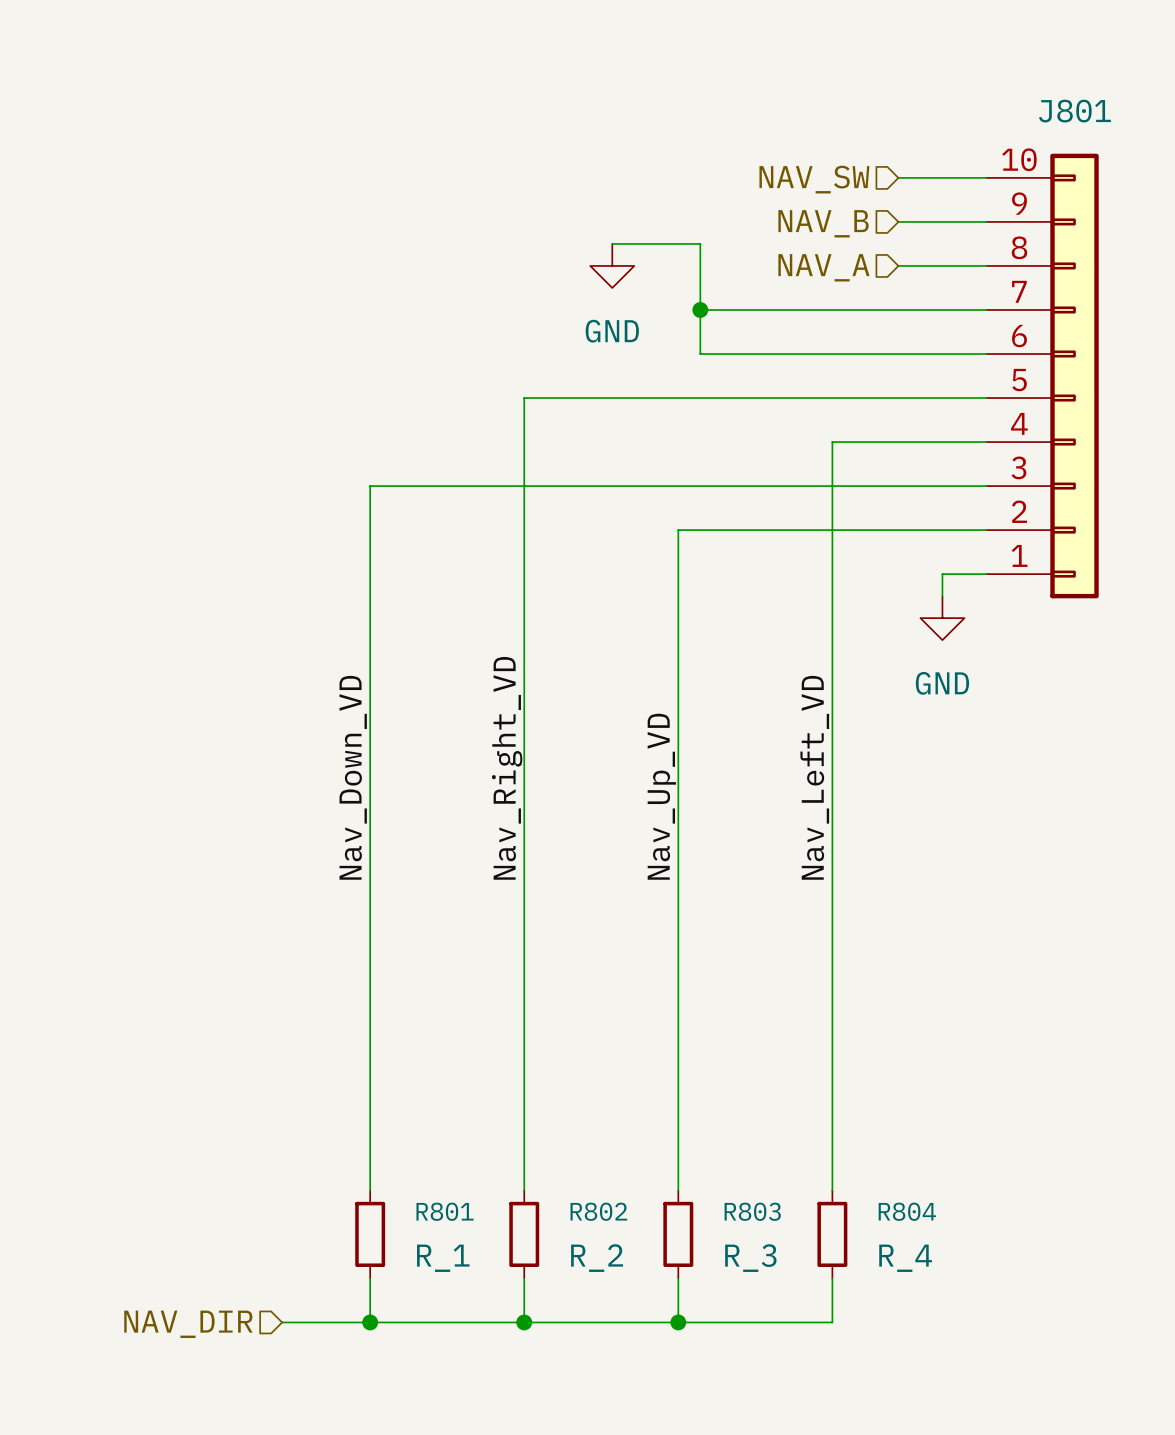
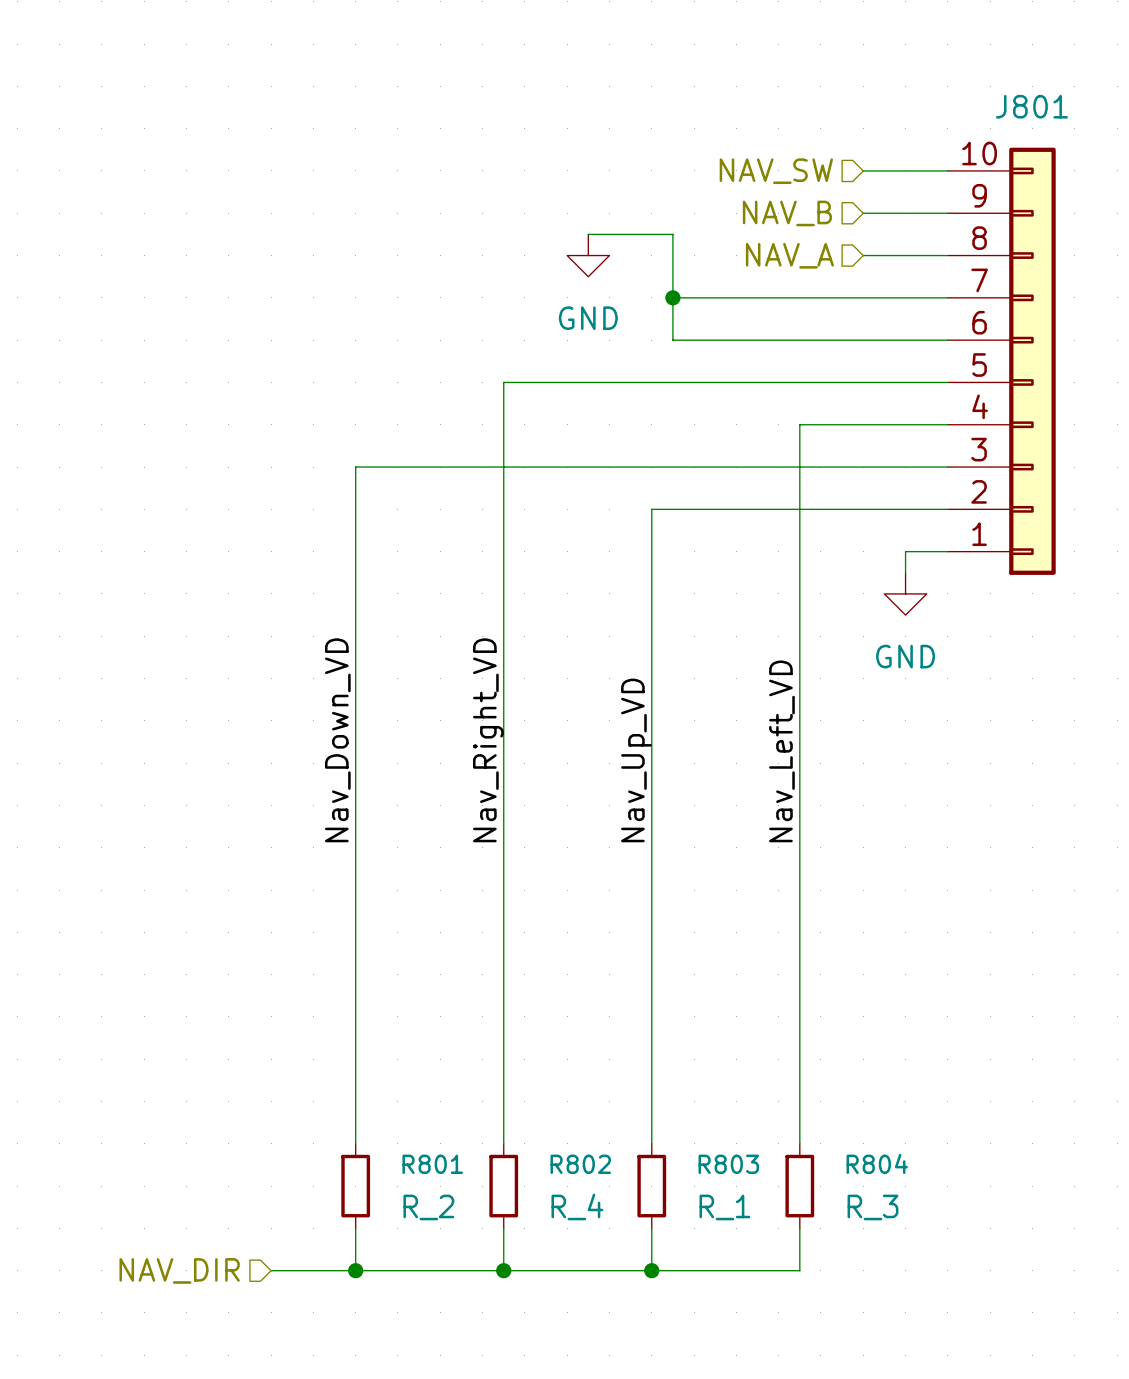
R801 value: R_1 (443, 1258) -> R_2 (428, 1207)
R802 value: R_2 (597, 1258) -> R_4 (577, 1206)
R803 value: R_3 (750, 1258) -> R_1 (724, 1207)
R804 value: R_4 (905, 1258) -> R_3 (872, 1207)

